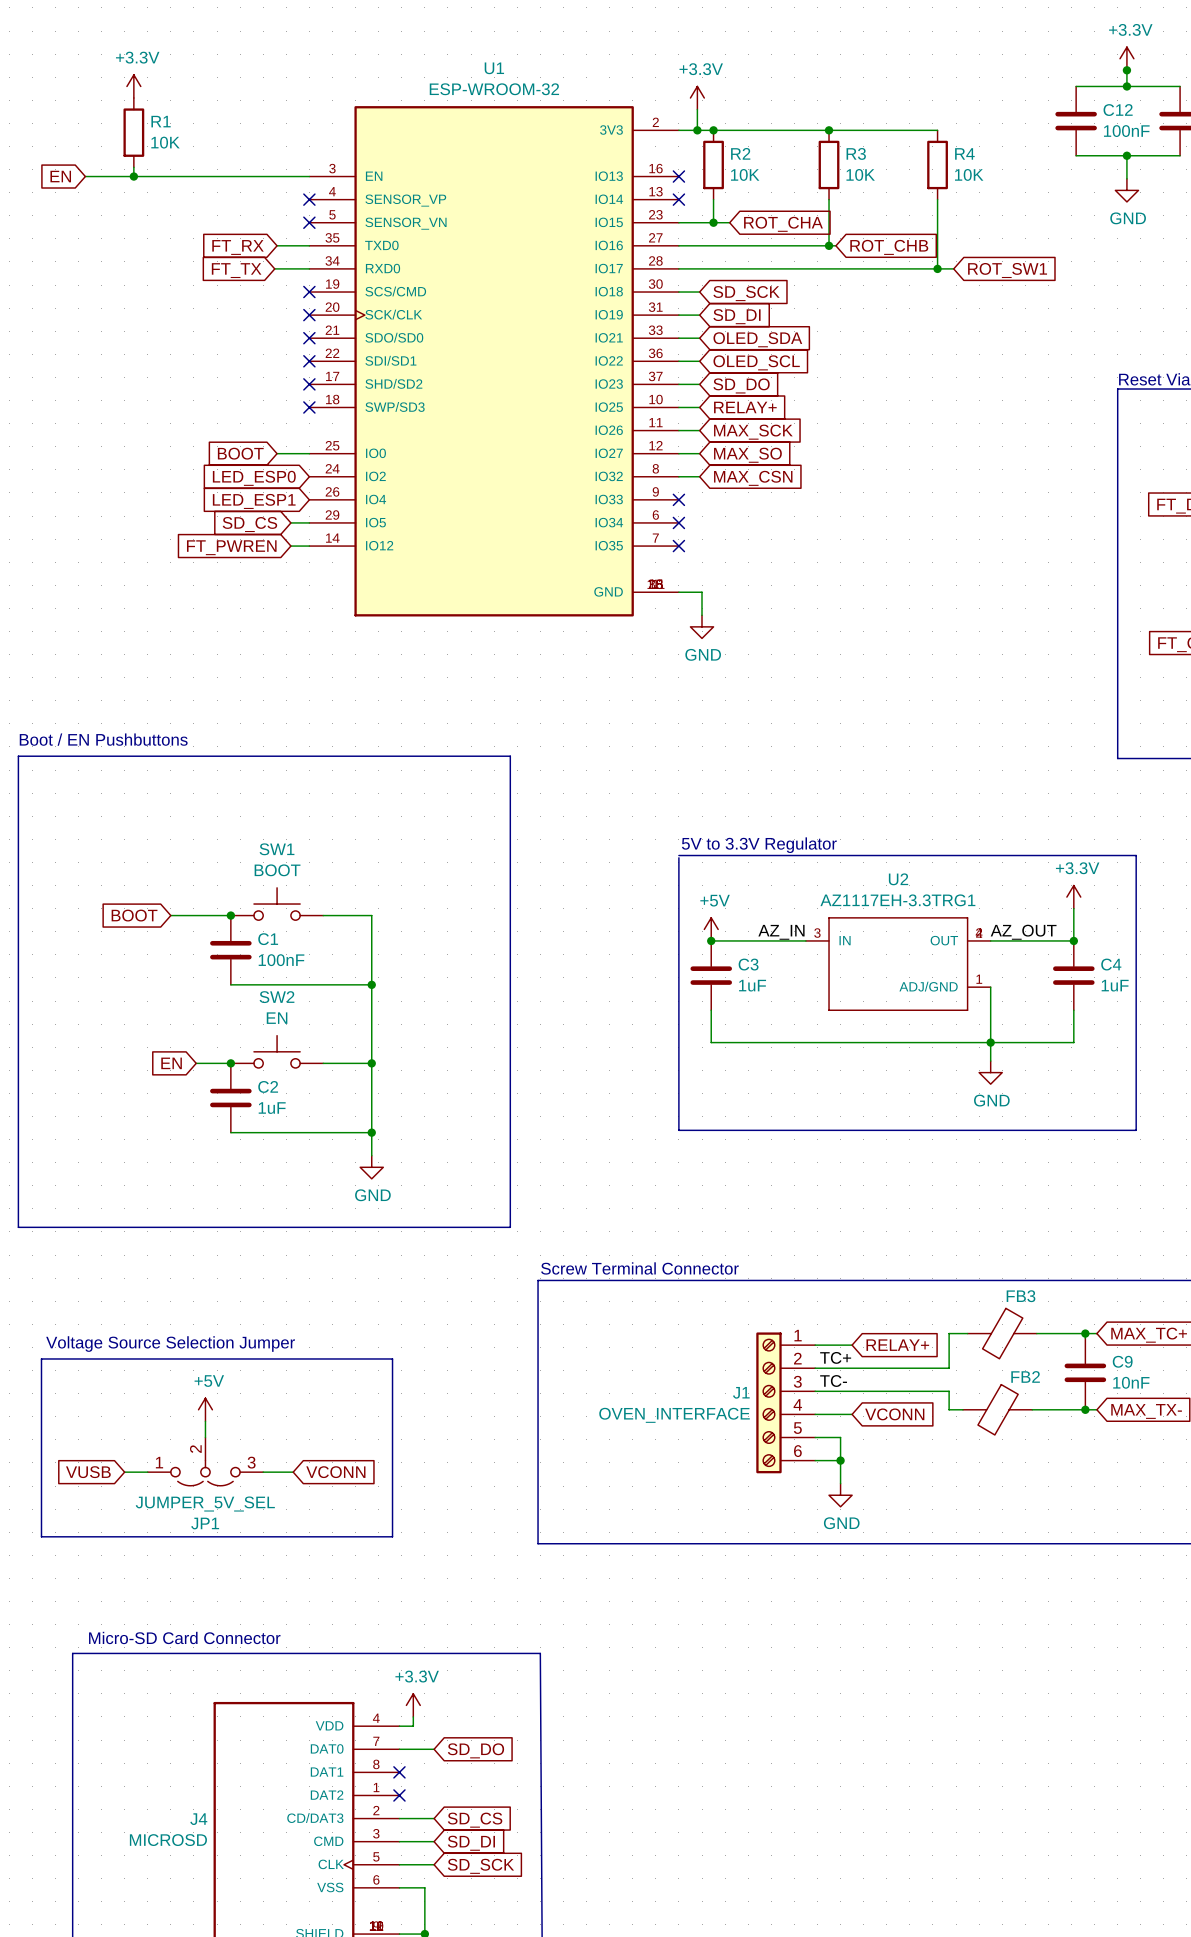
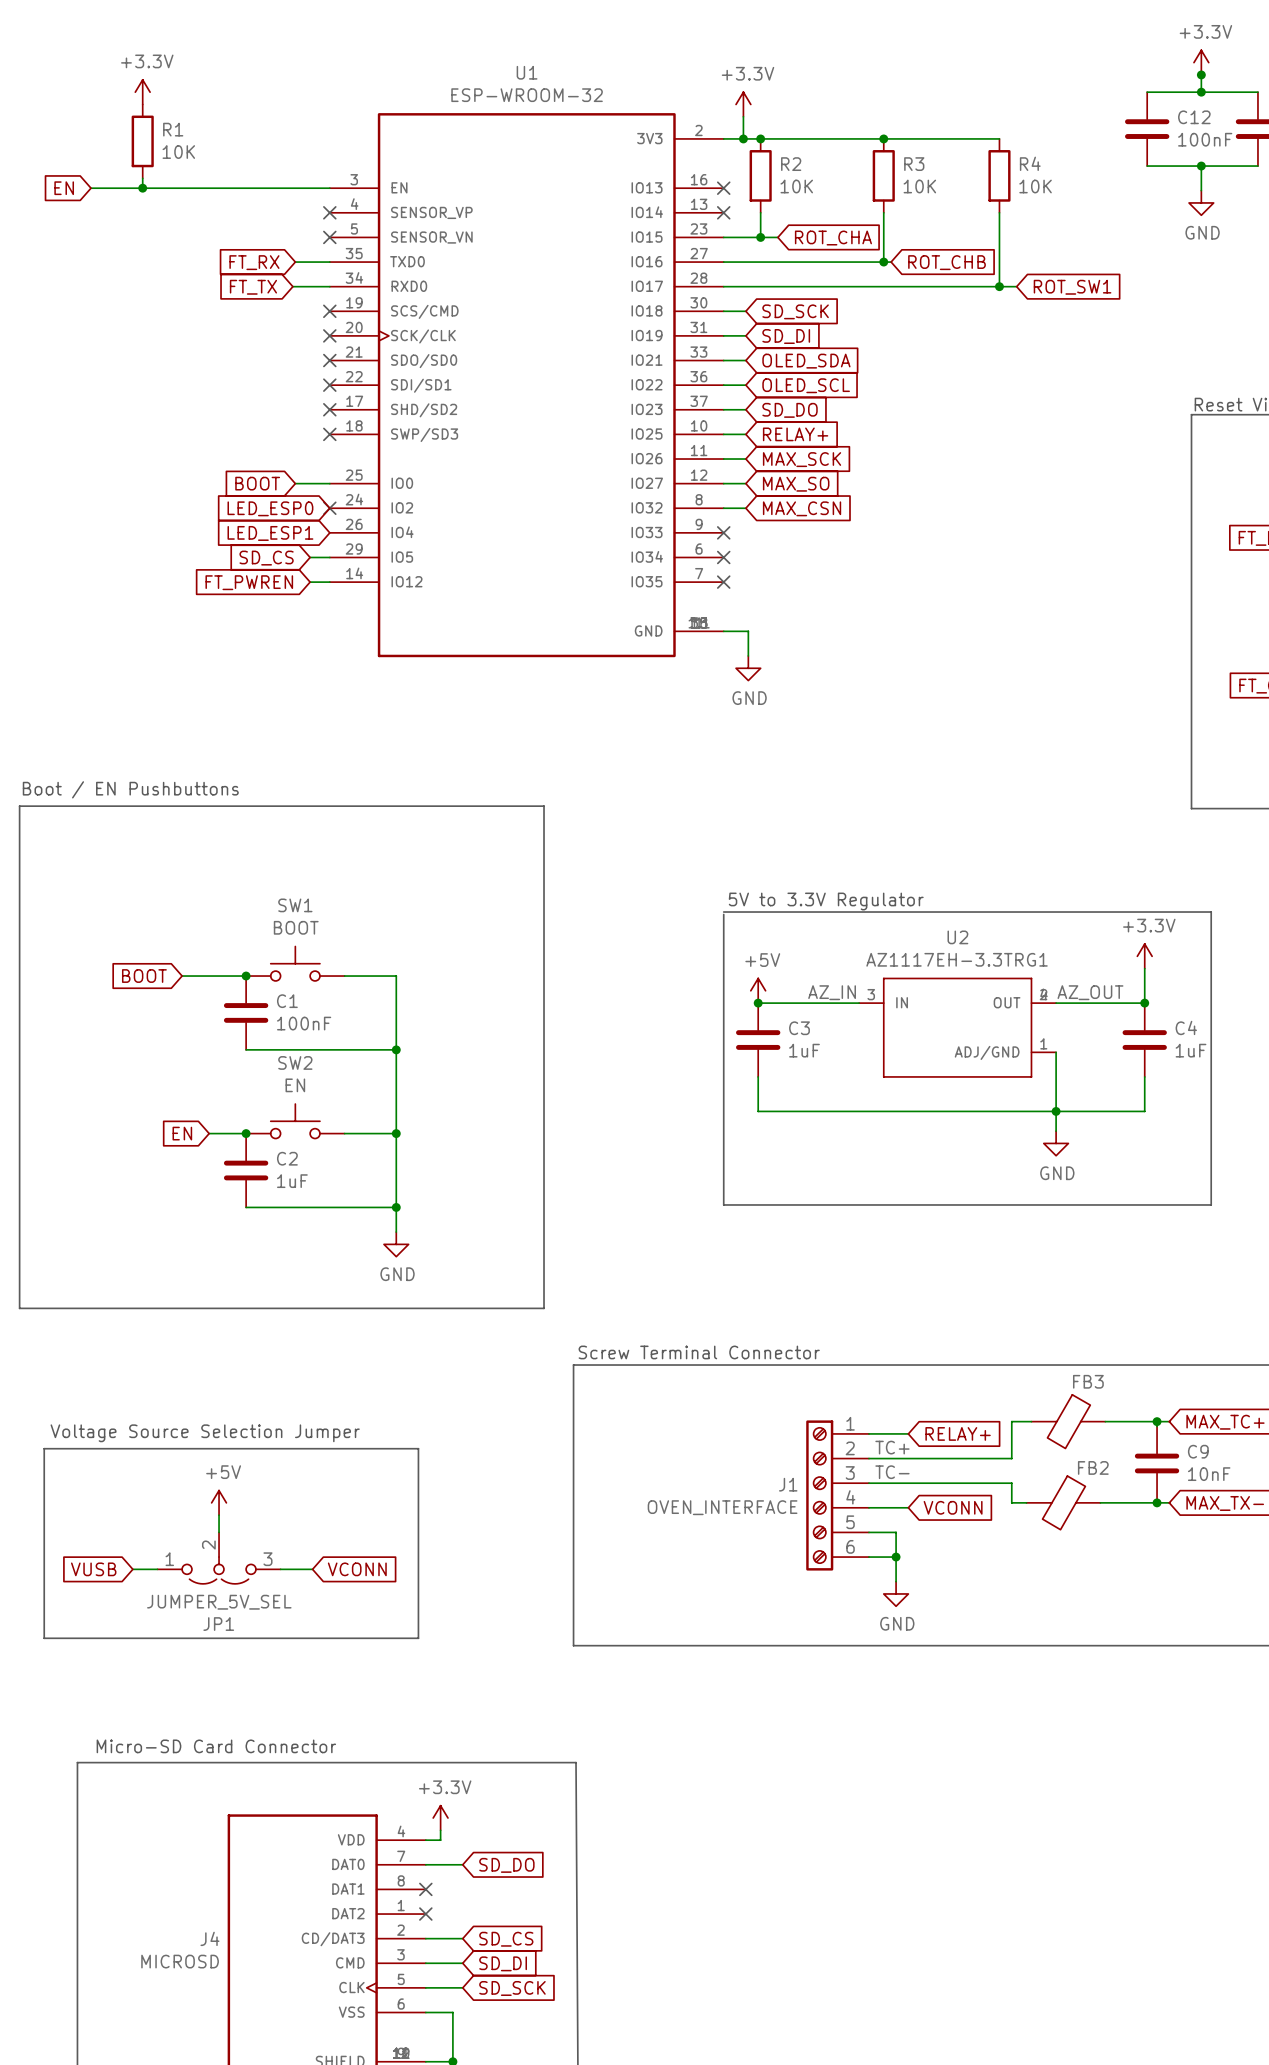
no-connect mark: none -> (329, 508)

